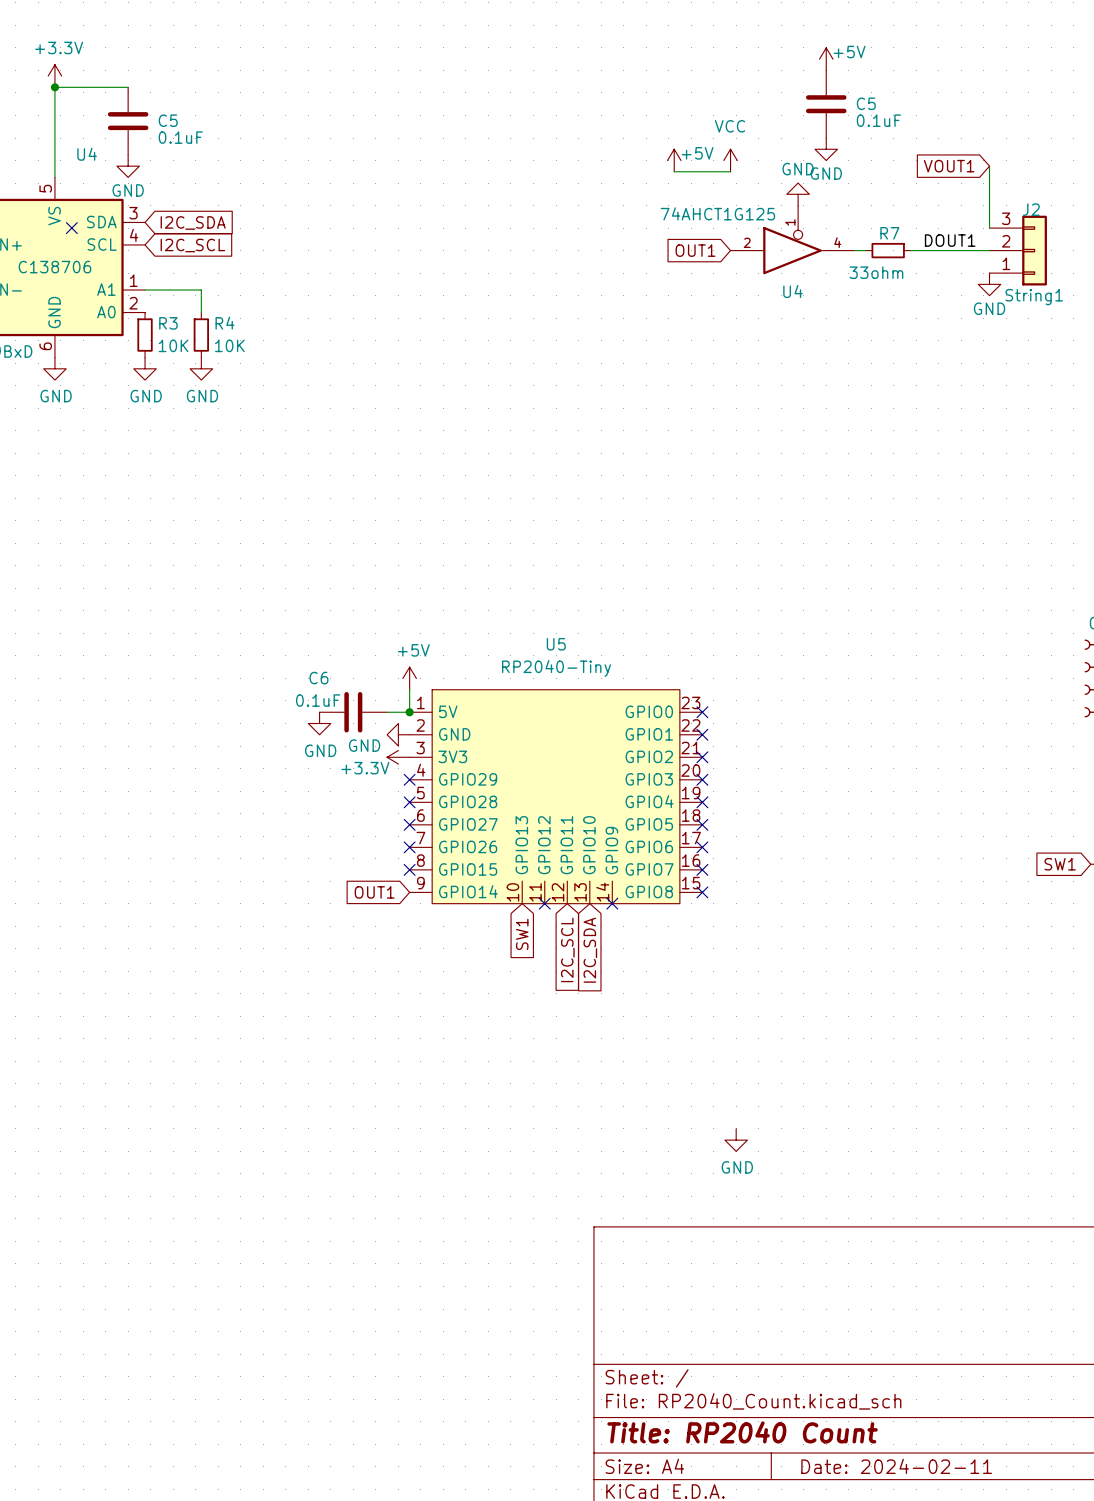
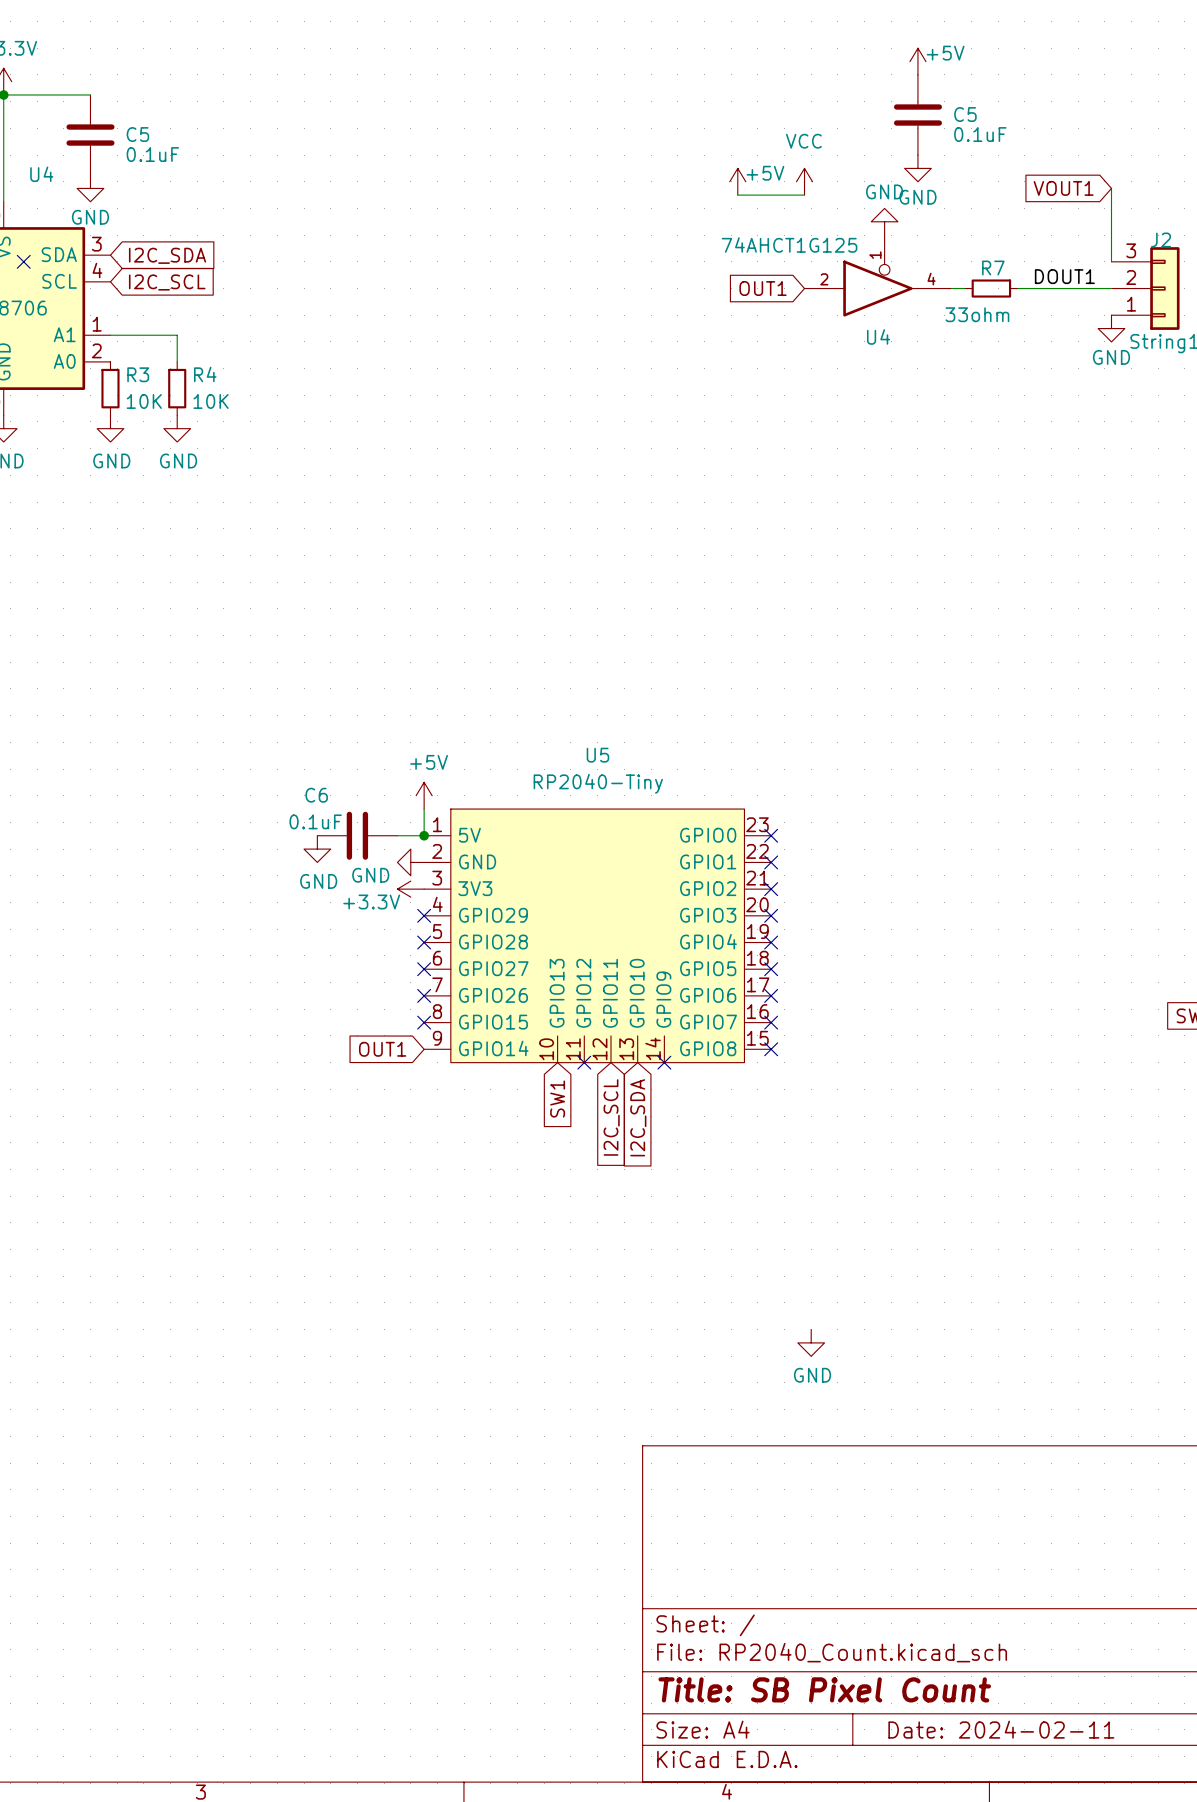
title block: Title: RP2040 Count (742, 1432) -> Title: SB Pixel Count (824, 1689)

